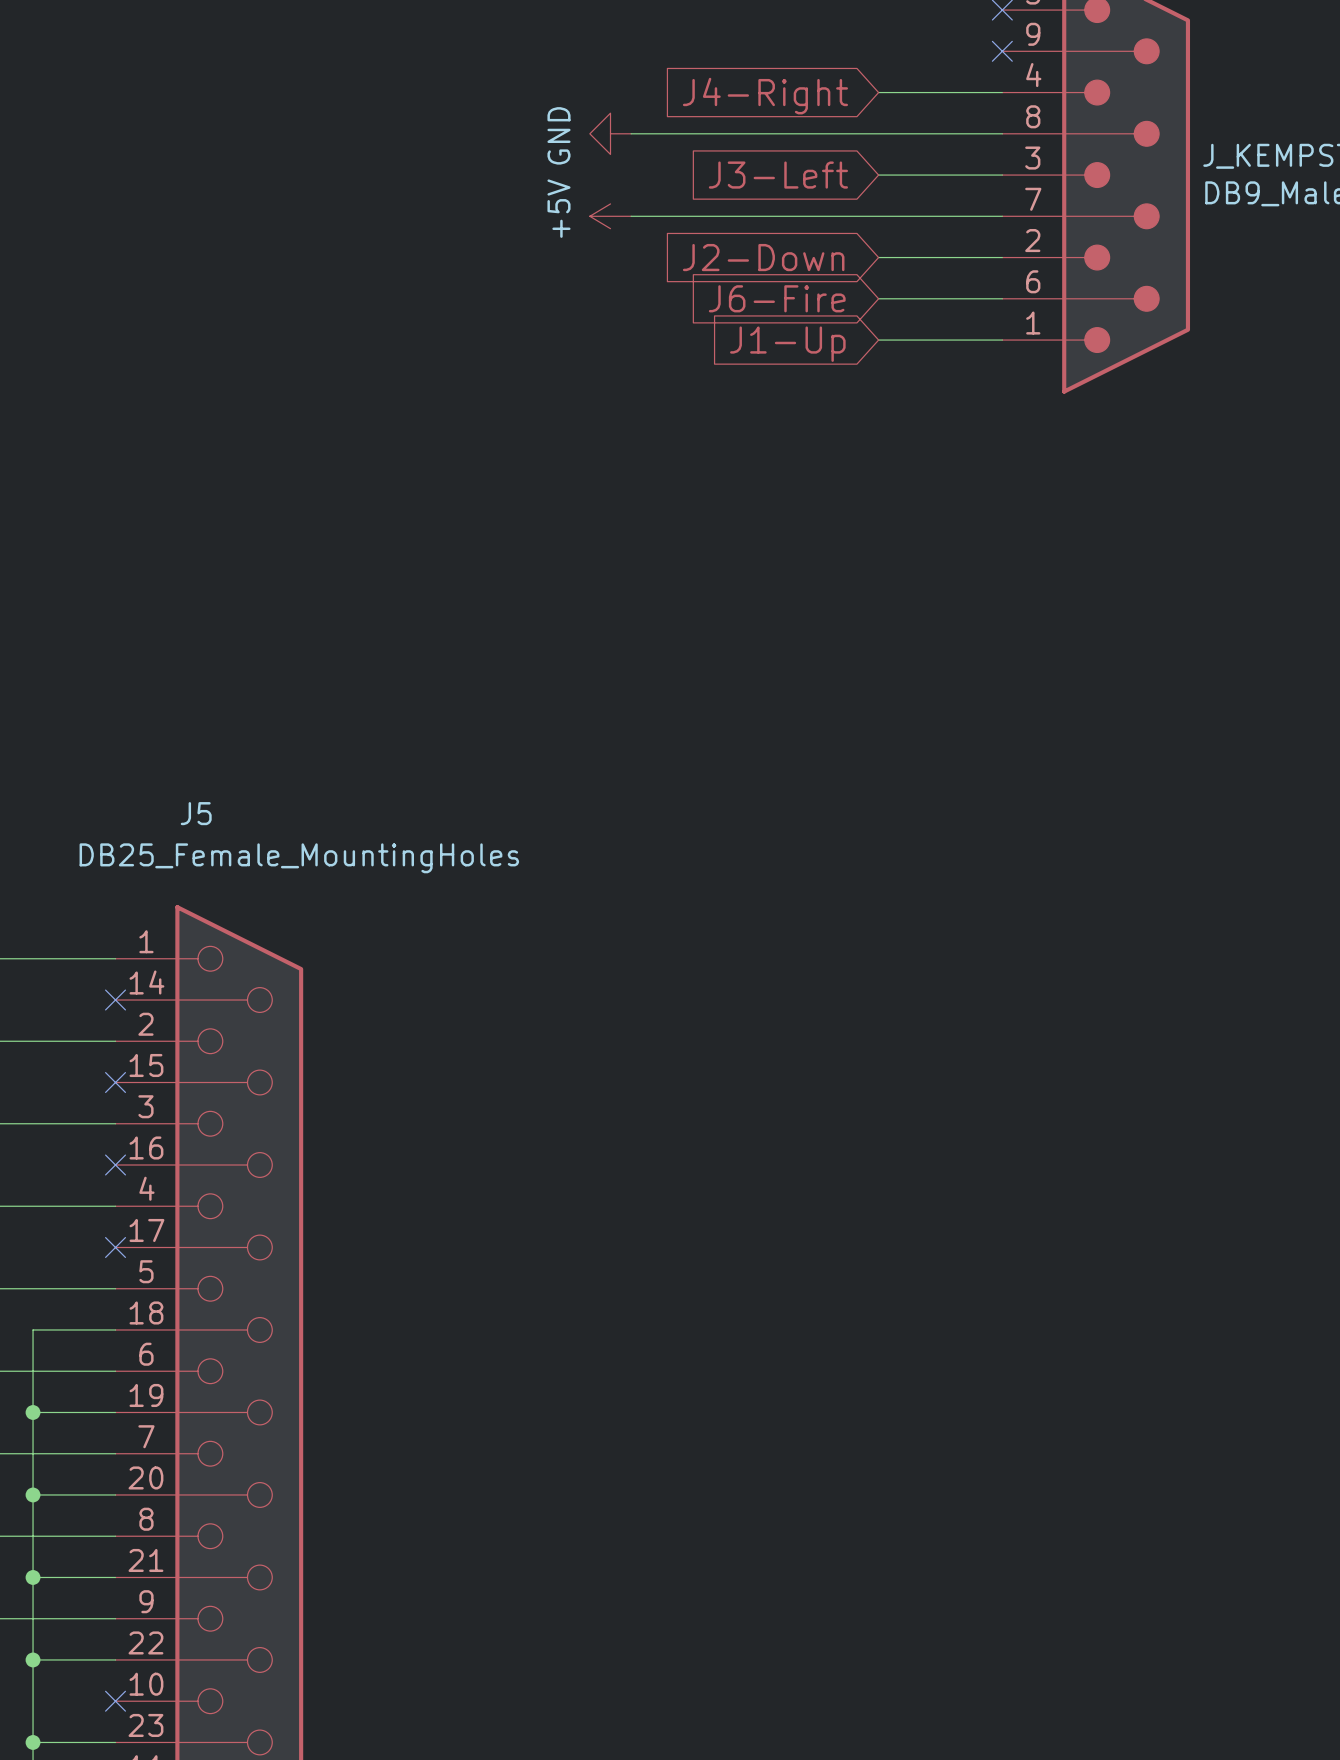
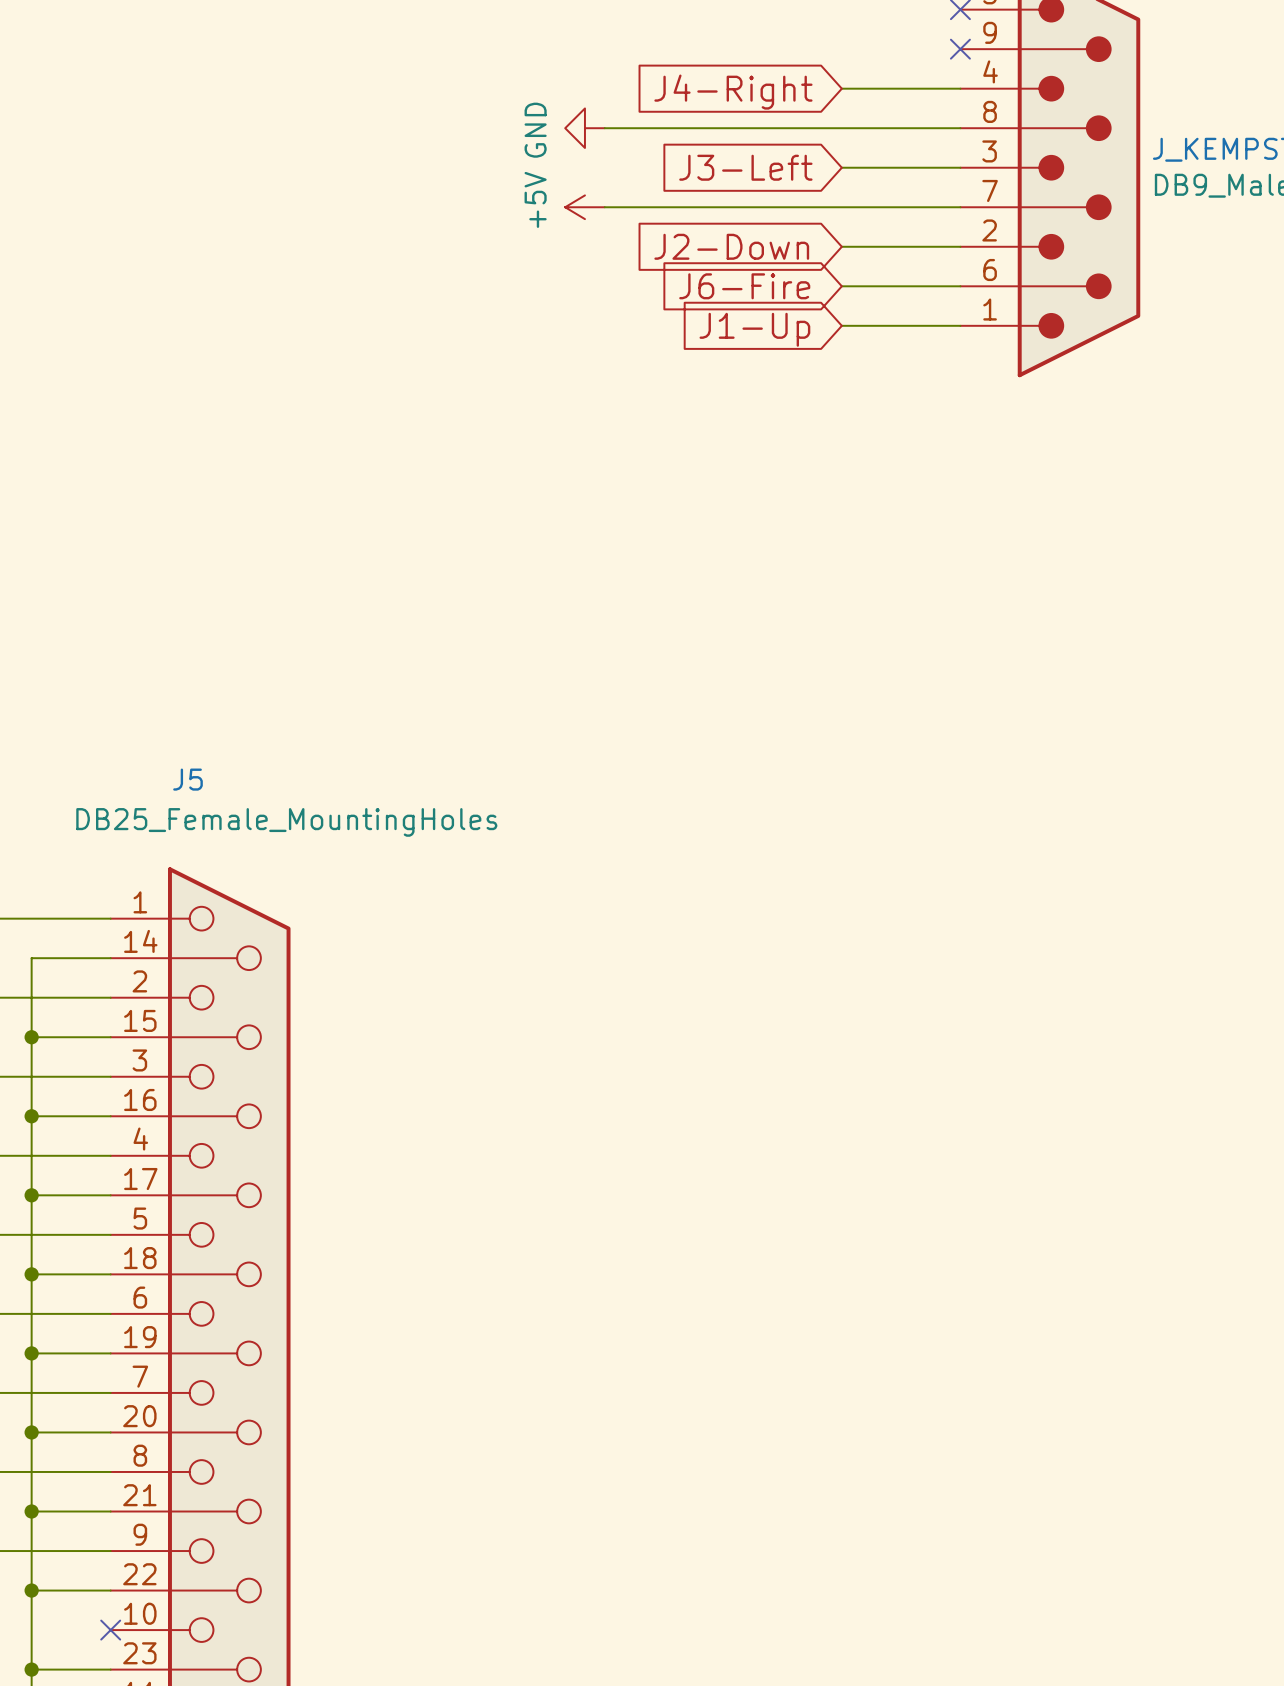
wire: none -> (110, 958) (31, 958) (31, 1274)
no-connect mark: (115, 1000) -> none
wire: none -> (31, 1037) (110, 1037)
junction: none -> (31, 1037)
no-connect mark: (115, 1082) -> none
wire: none -> (31, 1116) (110, 1116)
junction: none -> (31, 1116)
no-connect mark: (115, 1165) -> none
wire: none -> (31, 1195) (110, 1195)
junction: none -> (31, 1195)
no-connect mark: (115, 1247) -> none
junction: none -> (31, 1274)

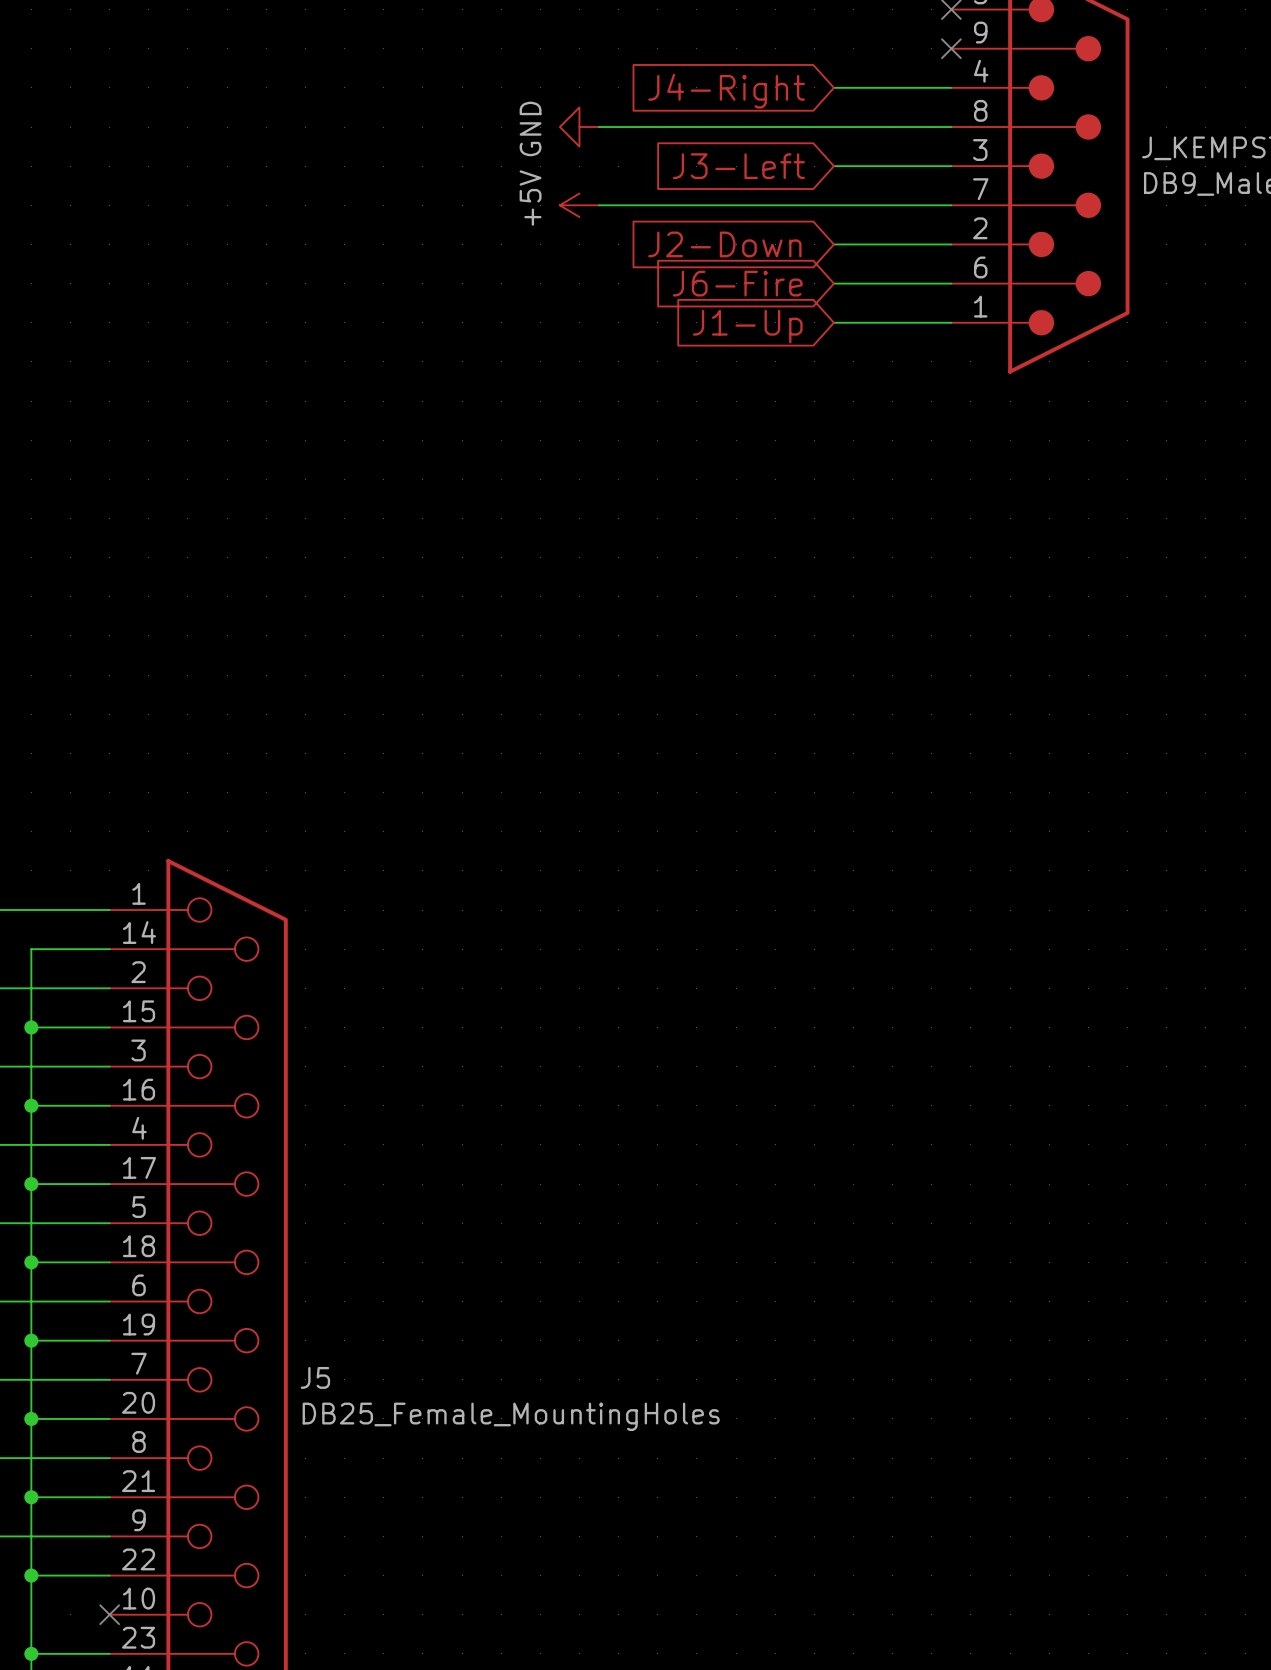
J5 name position: J5 (188, 779) -> J5 (315, 1377)
J5 value position: DB25_Female_MountingHoles (286, 822) -> DB25_Female_MountingHoles (511, 1416)

